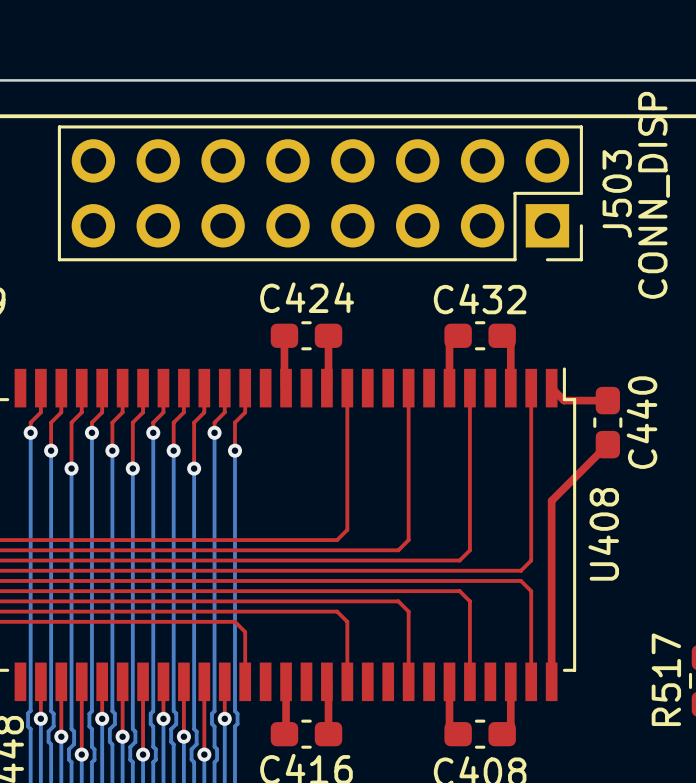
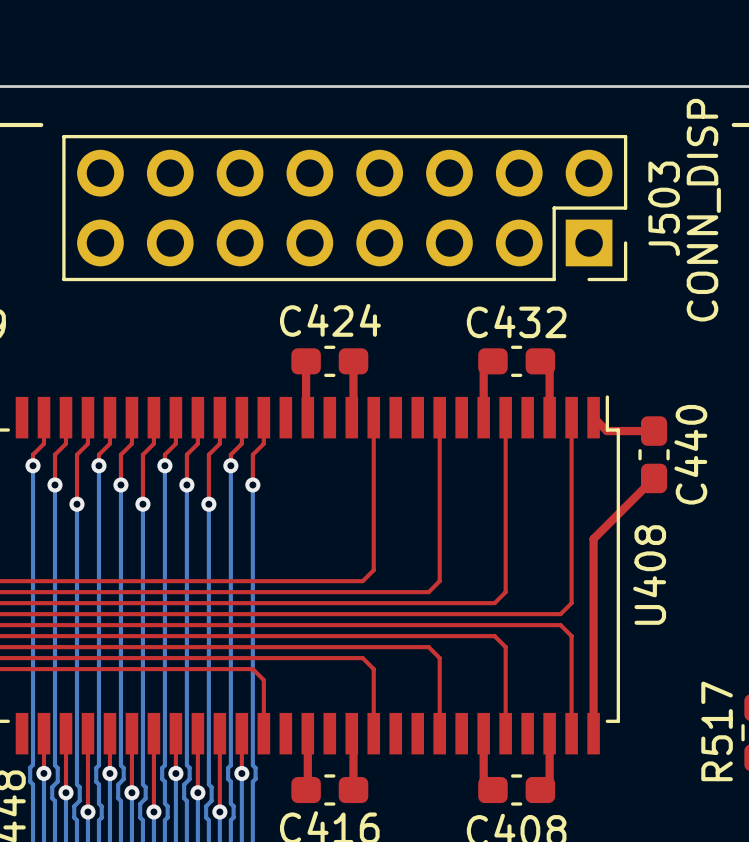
line: (38, 116) (681, 116) -> none

